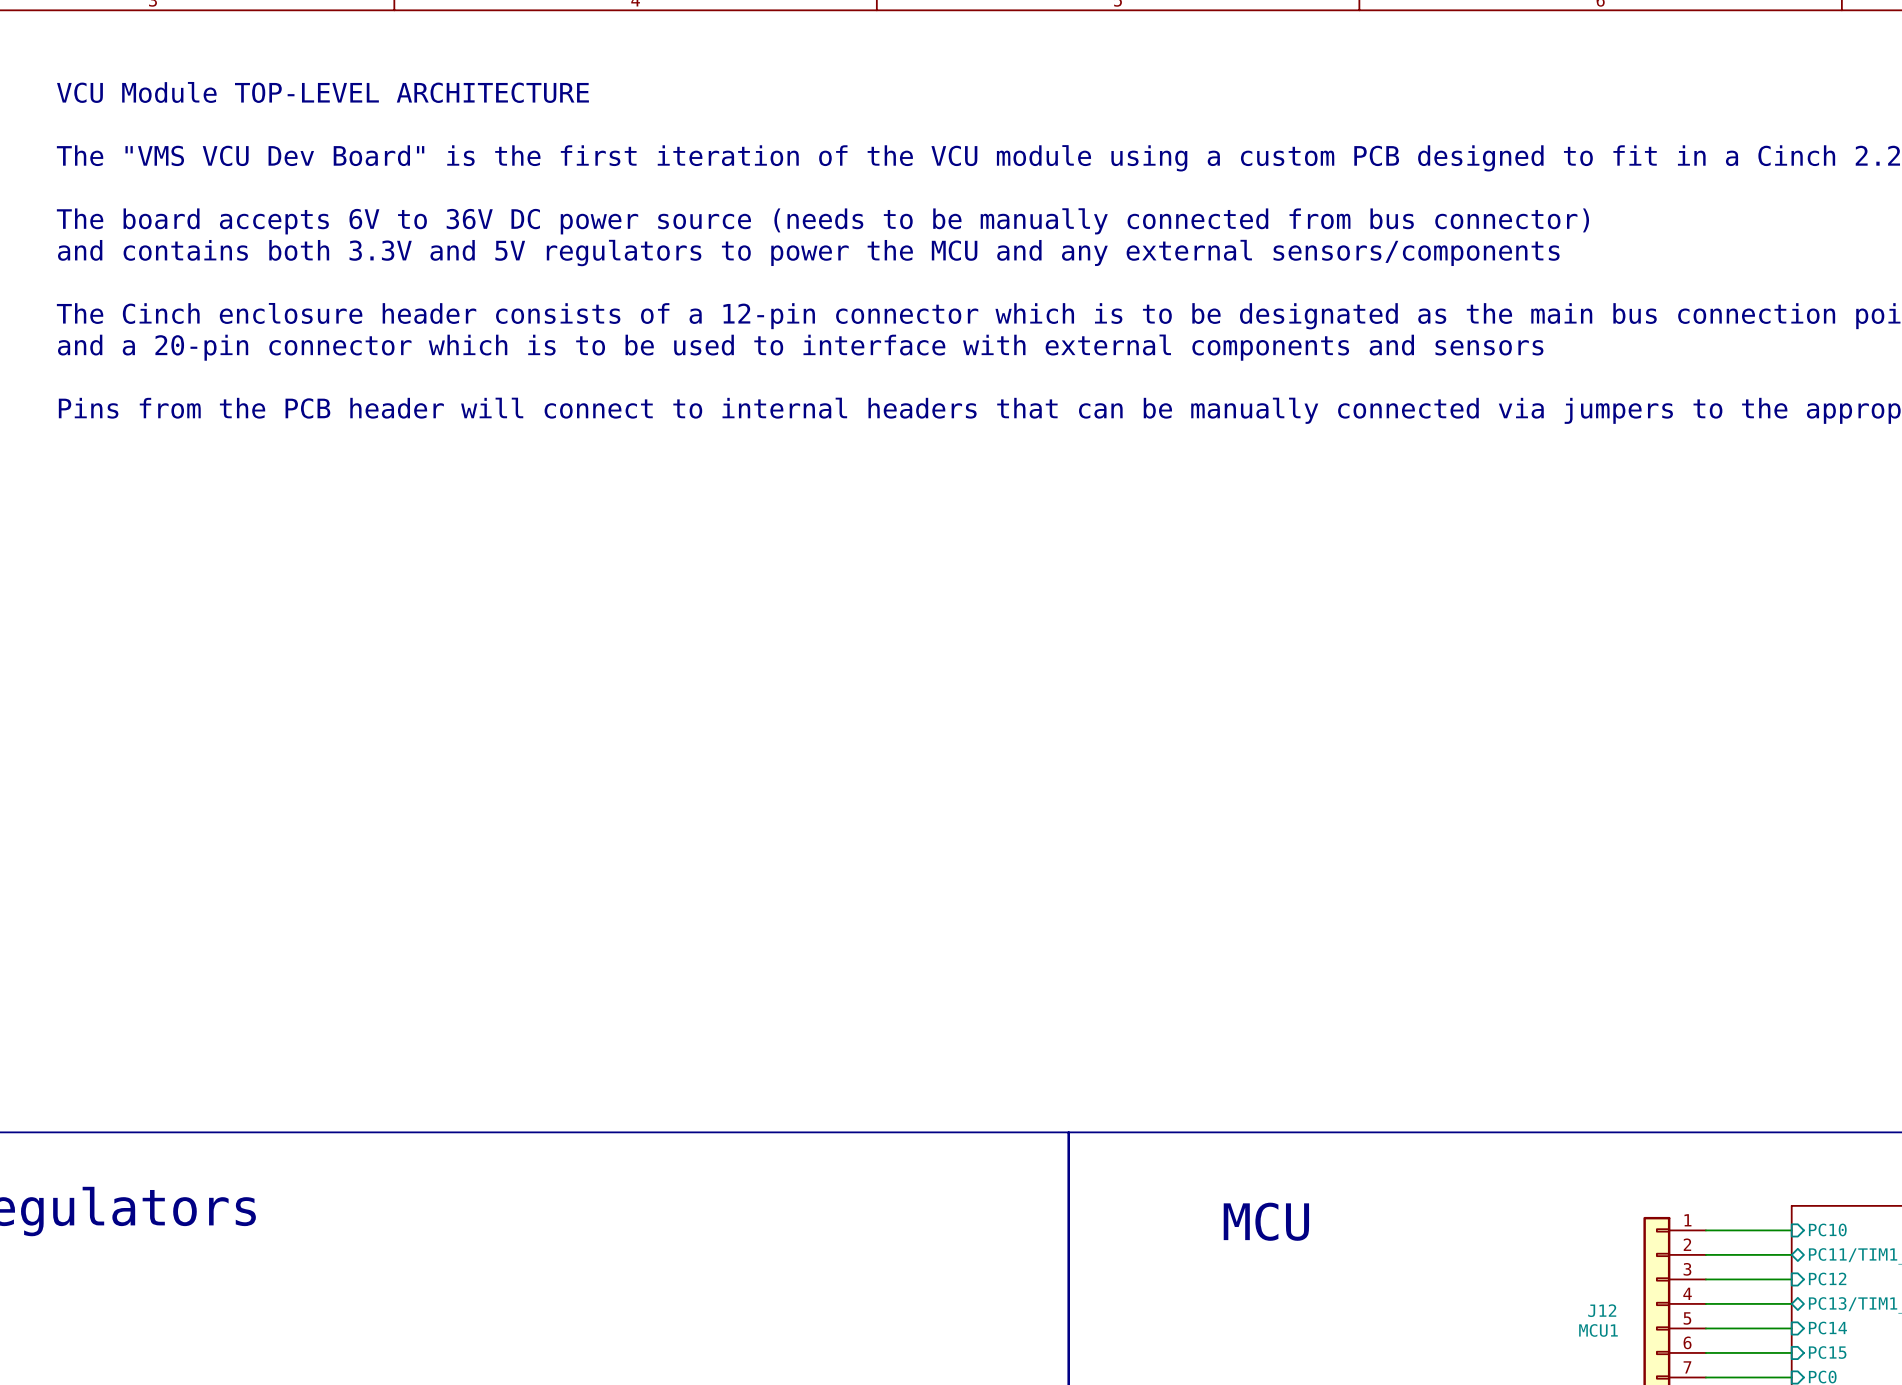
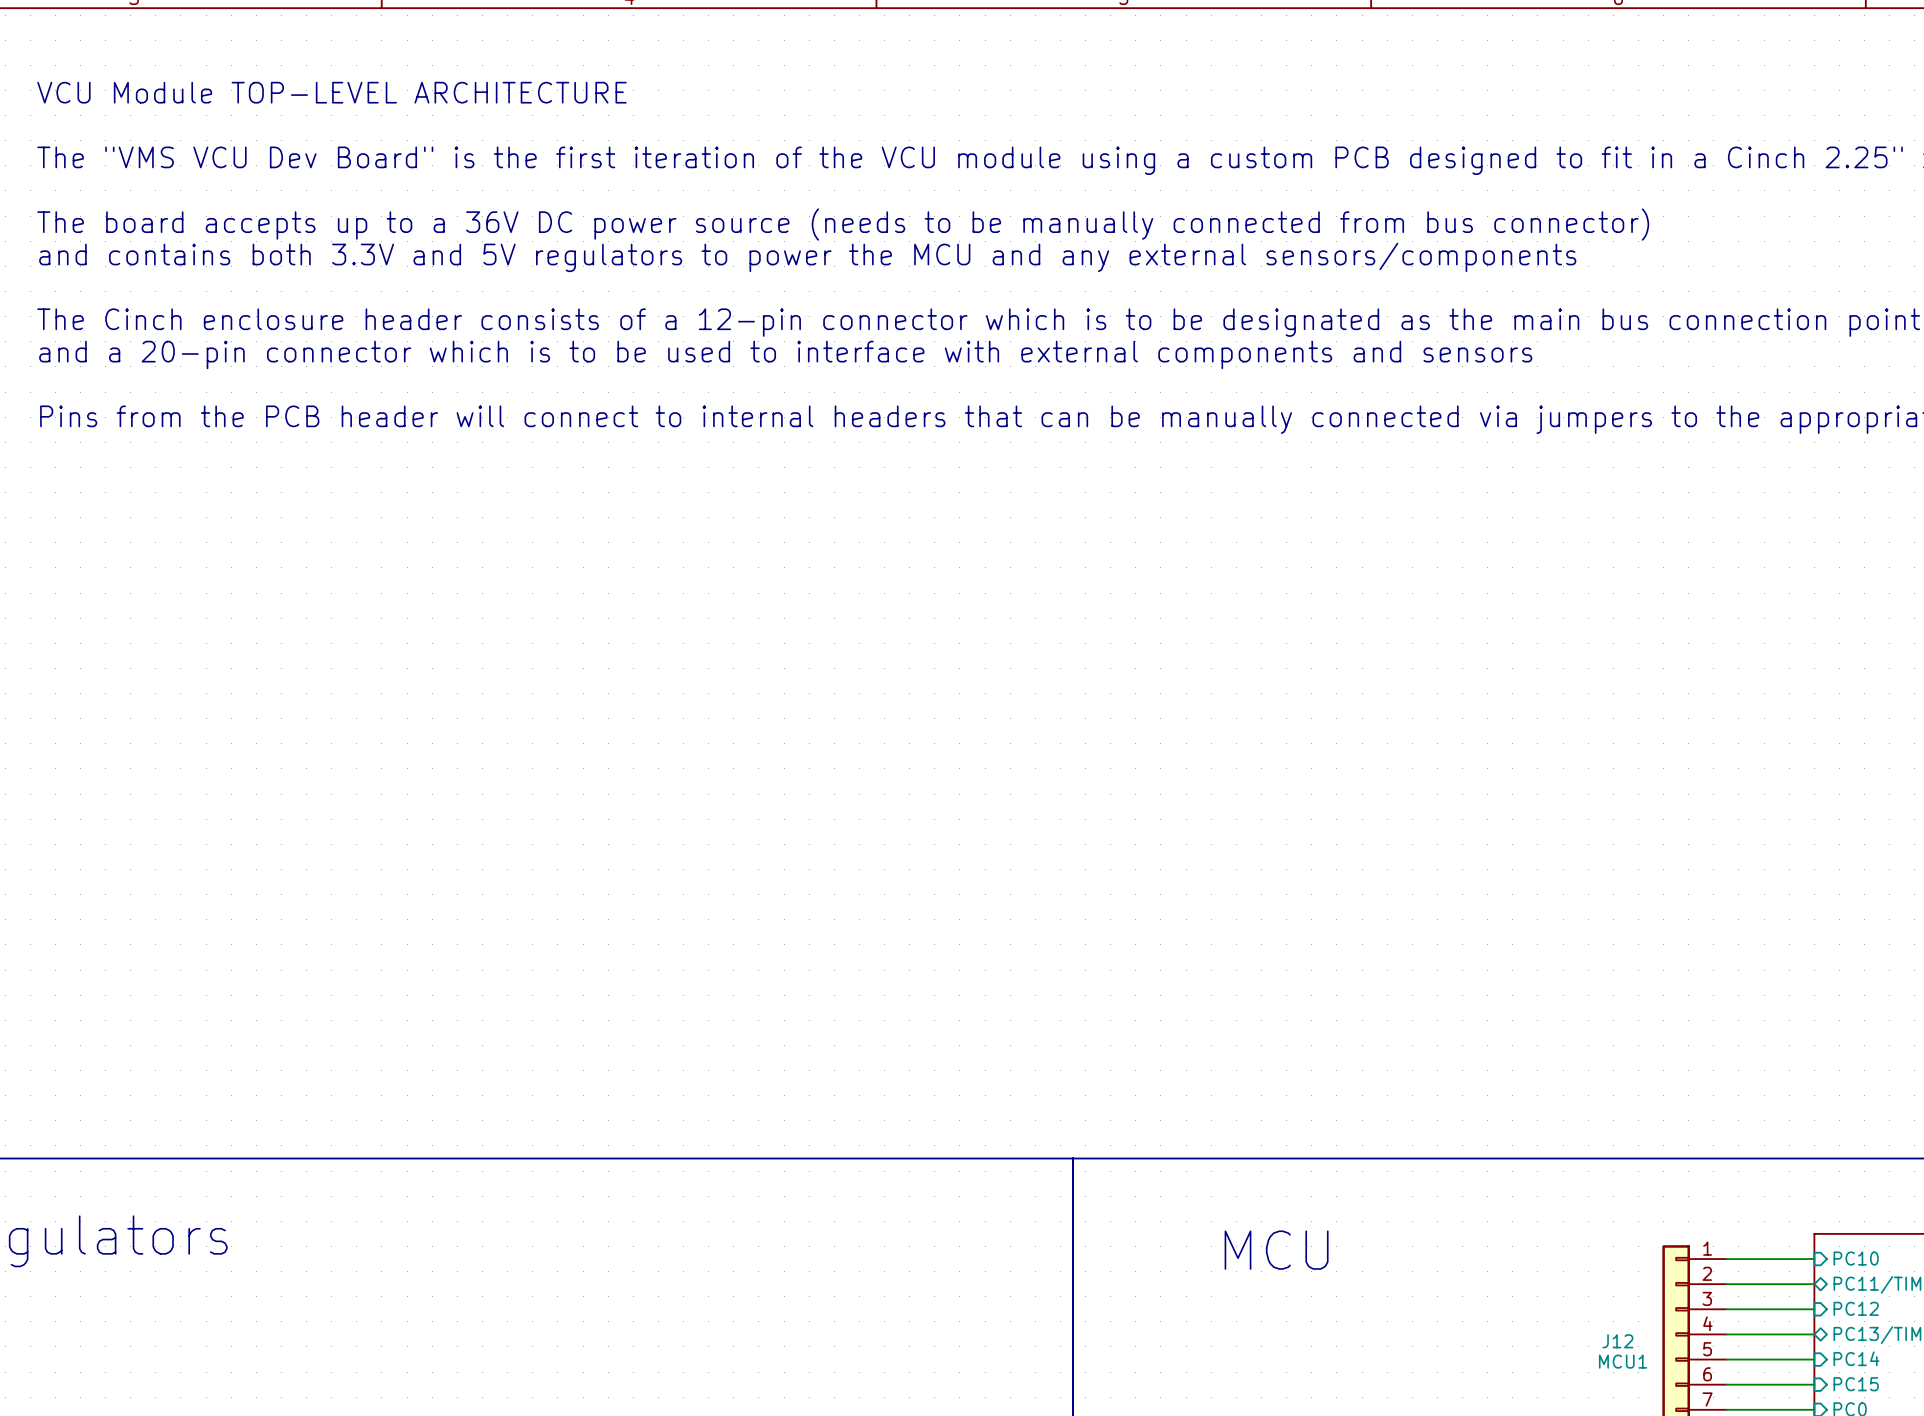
text: The board accepts 6V to 36V DC power source (needs to be manually connected from bus connector) (822, 221) -> The board accepts up to a 36V DC power source (needs to be manually connected from bus connector) (843, 224)

